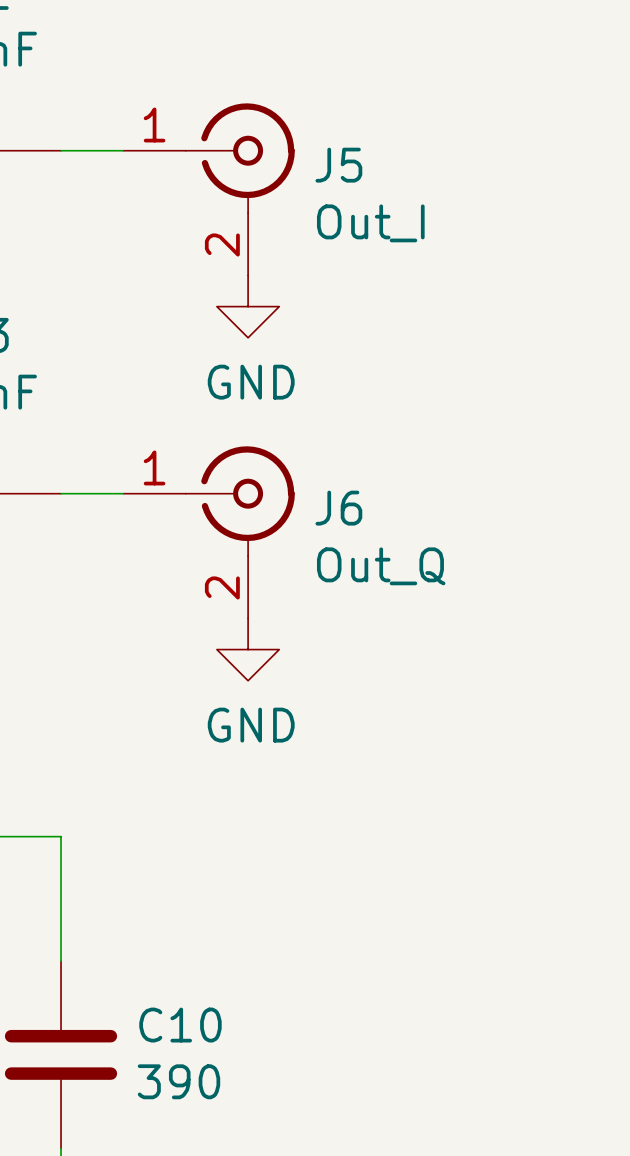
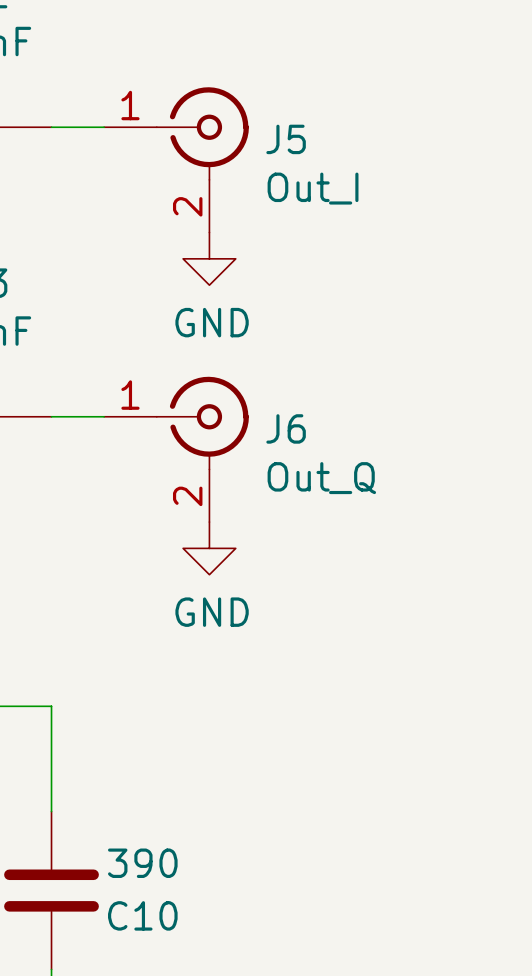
C10 name position: C10 (180, 1025) -> C10 (142, 915)
C10 value position: 390 (178, 1081) -> 390 (142, 863)

